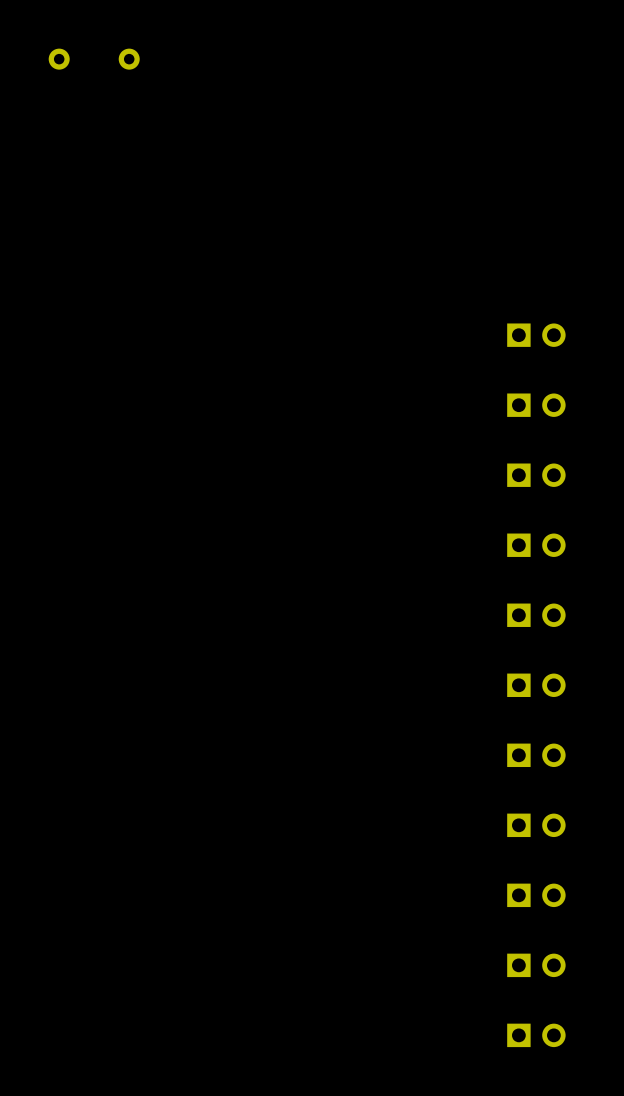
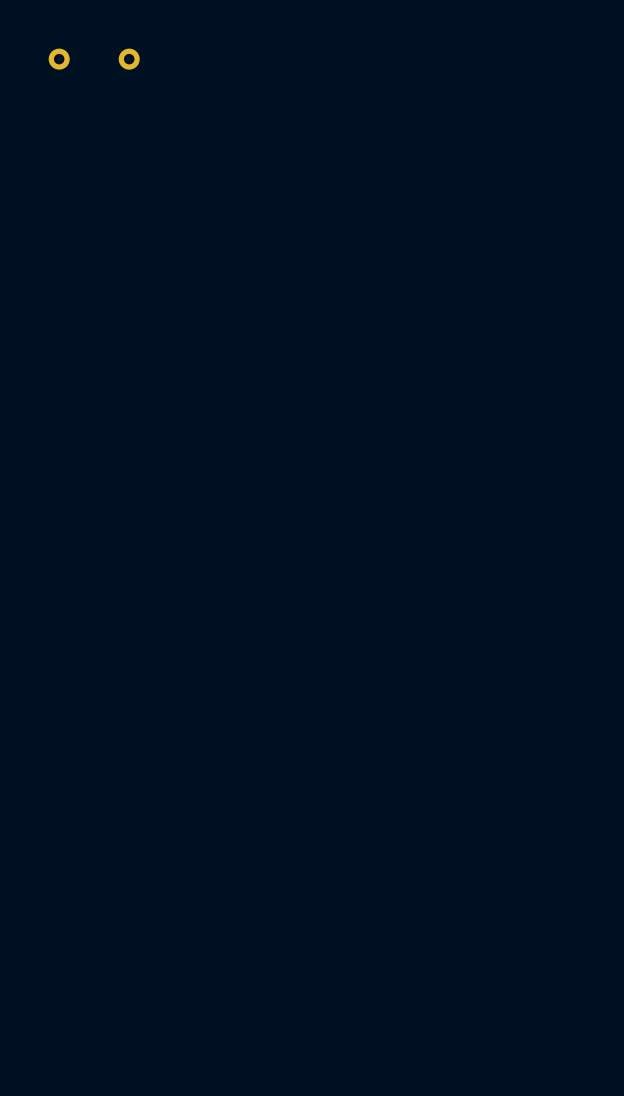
part: (536, 335) -> none
part: (536, 405) -> none
part: (536, 475) -> none
part: (536, 545) -> none
part: (536, 615) -> none
part: (536, 685) -> none
part: (536, 755) -> none
part: (536, 825) -> none
part: (536, 895) -> none
part: (536, 965) -> none
part: (536, 1035) -> none

